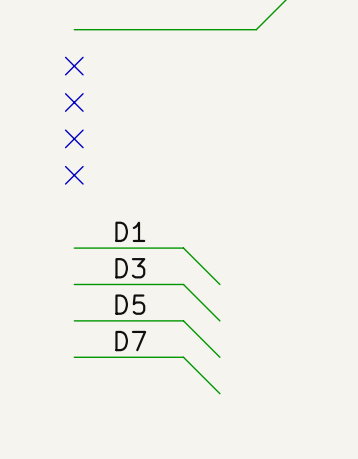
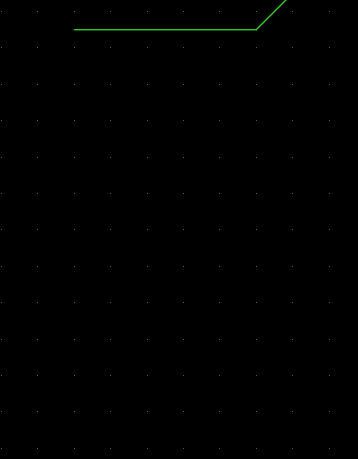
no-connect mark: (74, 66) -> none
no-connect mark: (74, 102) -> none
no-connect mark: (74, 138) -> none
no-connect mark: (74, 175) -> none
label: D1 (130, 231) -> none
wire: (74, 248) (183, 248) (219, 284) -> none
label: D3 (130, 268) -> none
wire: (74, 284) (183, 284) (219, 320) -> none
label: D5 (130, 304) -> none
wire: (74, 320) (183, 320) (219, 357) -> none
label: D7 (130, 341) -> none
wire: (74, 357) (183, 357) (219, 393) -> none

